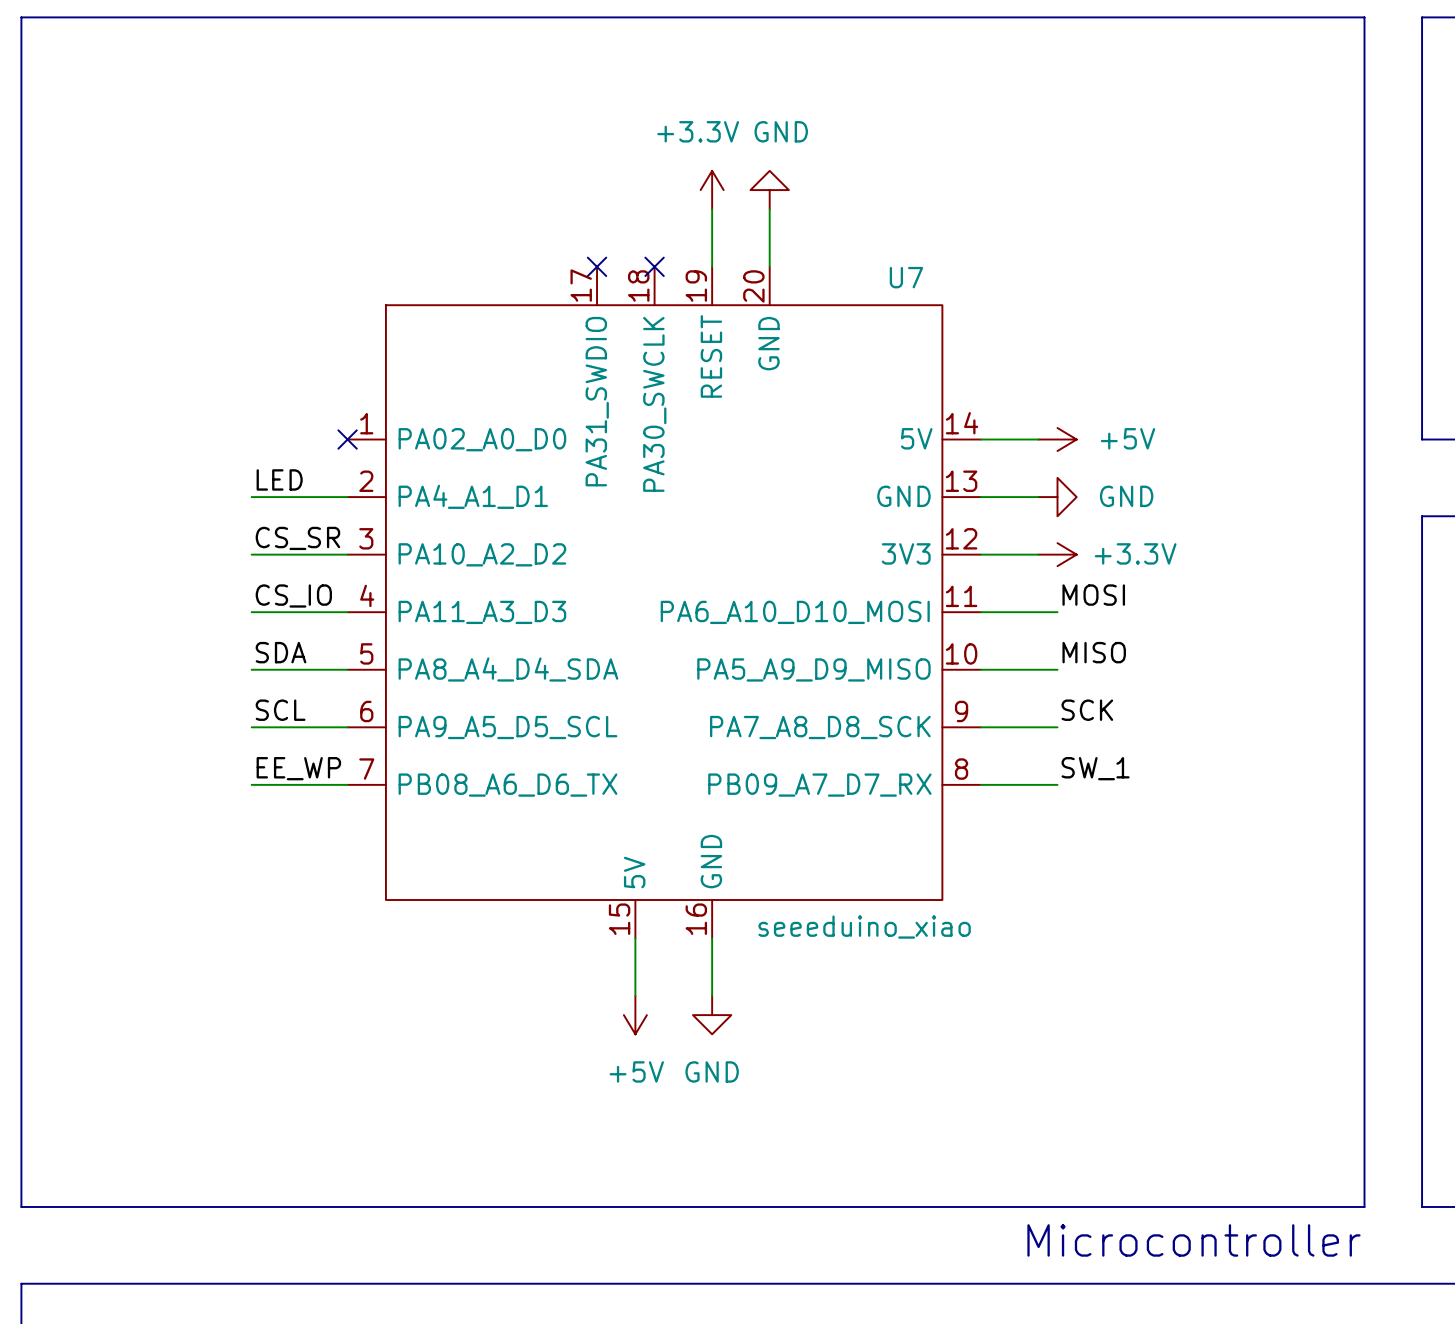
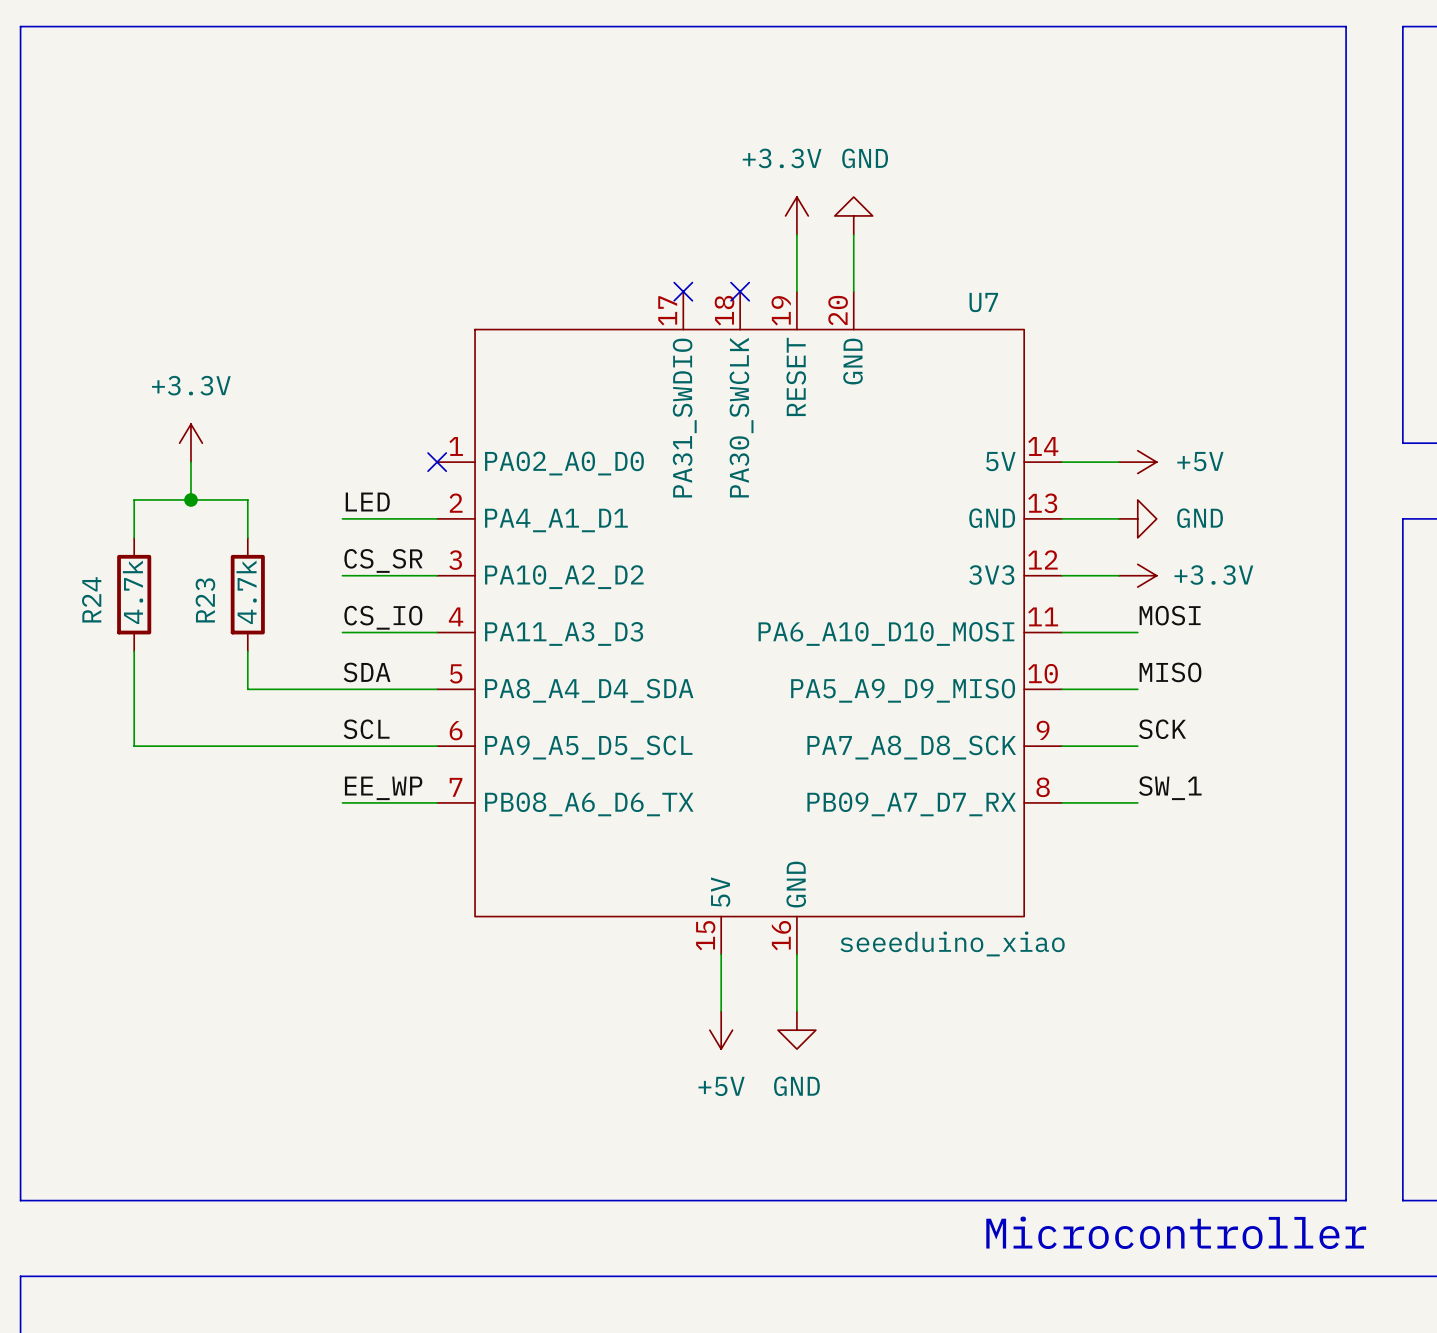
power symbol position: +3.3V (712, 190) -> +3.3V (796, 215)
power symbol position: GND (769, 190) -> GND (853, 215)
wire: (712, 209) (712, 266) -> (796, 234) (796, 291)
wire: (769, 209) (769, 266) -> (853, 234) (853, 291)
no-connect mark: (597, 266) -> none
no-connect mark position: (654, 266) -> (683, 291)
no-connect mark: none -> (740, 291)
power symbol: none -> +3.3V (190, 443)
no-connect mark: (347, 439) -> none
wire: (980, 439) (1038, 439) -> (1062, 462) (1118, 462)
power symbol position: +5V (1057, 439) -> +5V (1137, 462)
wire: none -> (190, 462) (190, 499)
no-connect mark: none -> (437, 462)
label position: LED (279, 479) -> LED (367, 502)
junction: none -> (190, 499)
wire: (251, 497) (347, 497) -> (342, 518) (437, 518)
wire: (980, 497) (1038, 497) -> (1062, 518) (1118, 518)
power symbol position: GND (1057, 497) -> GND (1137, 518)
wire: none -> (134, 537) (134, 499) (247, 499) (247, 537)
label position: CS_SR (297, 538) -> CS_SR (383, 560)
wire: (251, 554) (347, 554) -> (342, 575) (437, 575)
wire: (980, 554) (1038, 554) -> (1062, 575) (1118, 575)
power symbol position: +3.3V (1057, 554) -> +3.3V (1137, 575)
R24: none -> 4.7k (134, 594)
R23: none -> 4.7k (247, 594)
label position: CS_IO (293, 595) -> CS_IO (383, 617)
label position: MOSI (1093, 595) -> MOSI (1170, 615)
U7 position: (664, 602) -> (749, 623)
wire: (251, 612) (347, 612) -> (342, 632) (437, 632)
wire: (980, 612) (1057, 612) -> (1062, 632) (1137, 632)
wire: none -> (134, 651) (134, 746) (437, 746)
wire: none -> (247, 651) (247, 689) (437, 689)
label position: SDA (281, 652) -> SDA (367, 672)
label position: MISO (1094, 652) -> MISO (1170, 672)
wire: (251, 669) (347, 669) -> none
wire: (980, 669) (1057, 669) -> (1062, 689) (1137, 689)
label position: SCL (280, 710) -> SCL (366, 729)
label position: SCK (1087, 710) -> SCK (1162, 729)
wire: (251, 727) (347, 727) -> none
wire: (980, 727) (1057, 727) -> (1062, 746) (1137, 746)
label position: EE_WP (298, 768) -> EE_WP (383, 788)
label position: SW_1 (1095, 768) -> SW_1 (1170, 788)
wire: (251, 784) (347, 784) -> (342, 802) (437, 802)
wire: (980, 784) (1057, 784) -> (1062, 802) (1137, 802)
wire: (635, 938) (635, 995) -> (721, 954) (721, 1011)
wire: (712, 938) (712, 995) -> (796, 954) (796, 1011)
power symbol position: +5V (635, 1015) -> +5V (721, 1030)
power symbol position: GND (712, 1015) -> GND (796, 1030)

